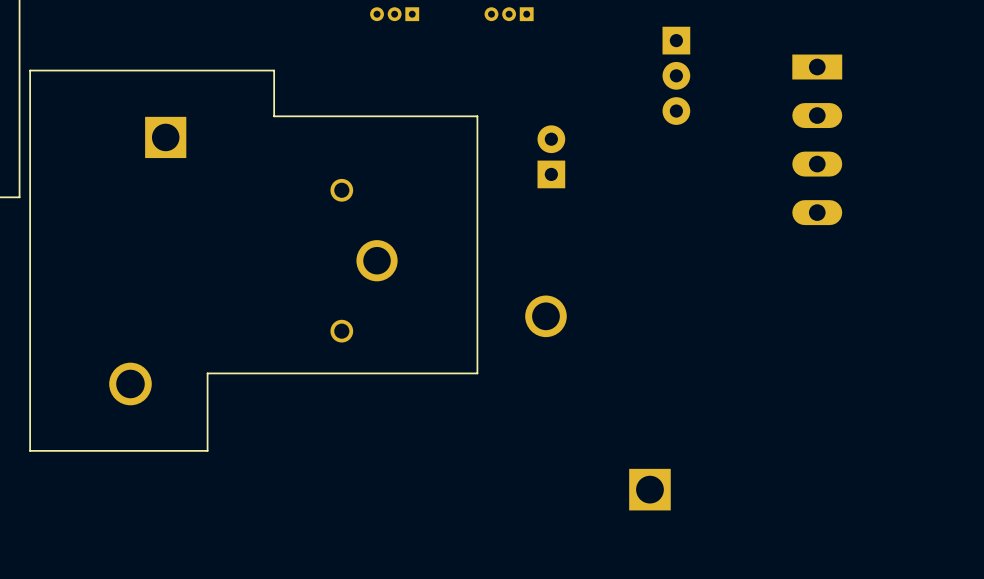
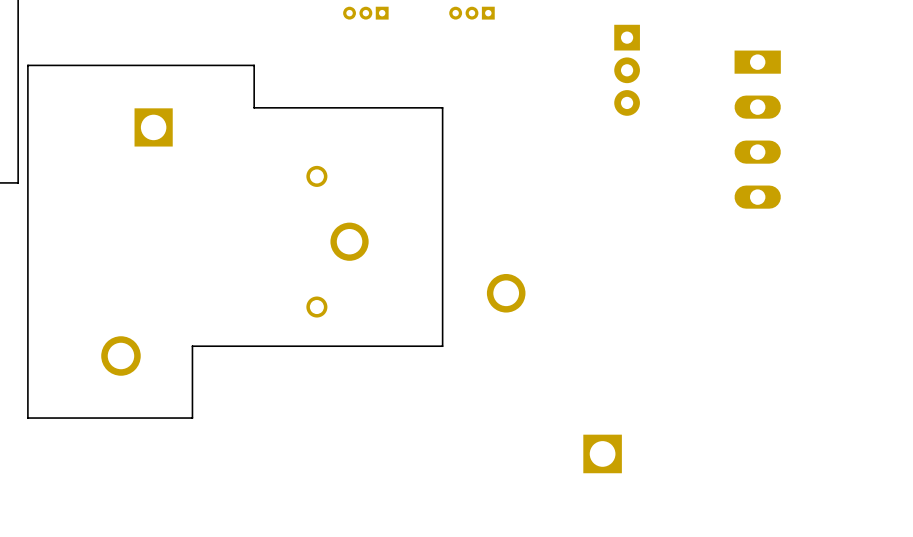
part: (551, 156) -> none

